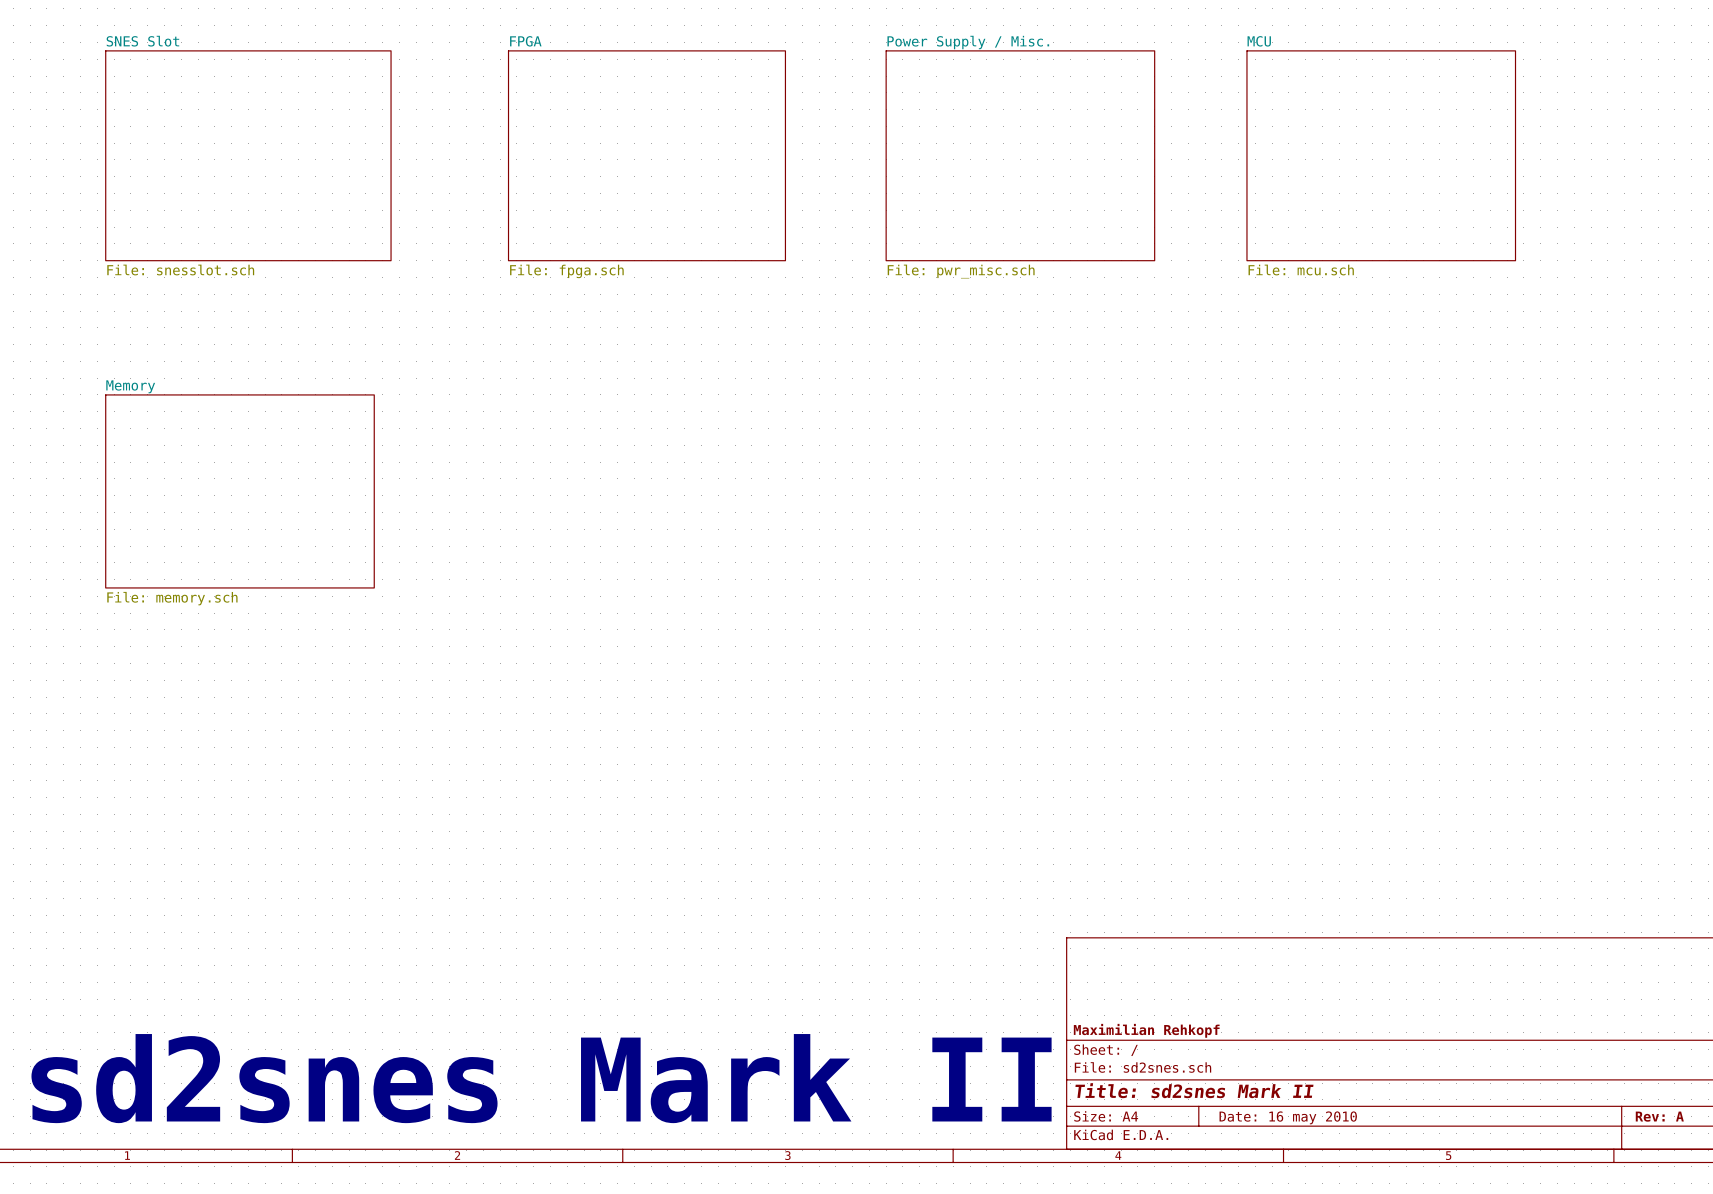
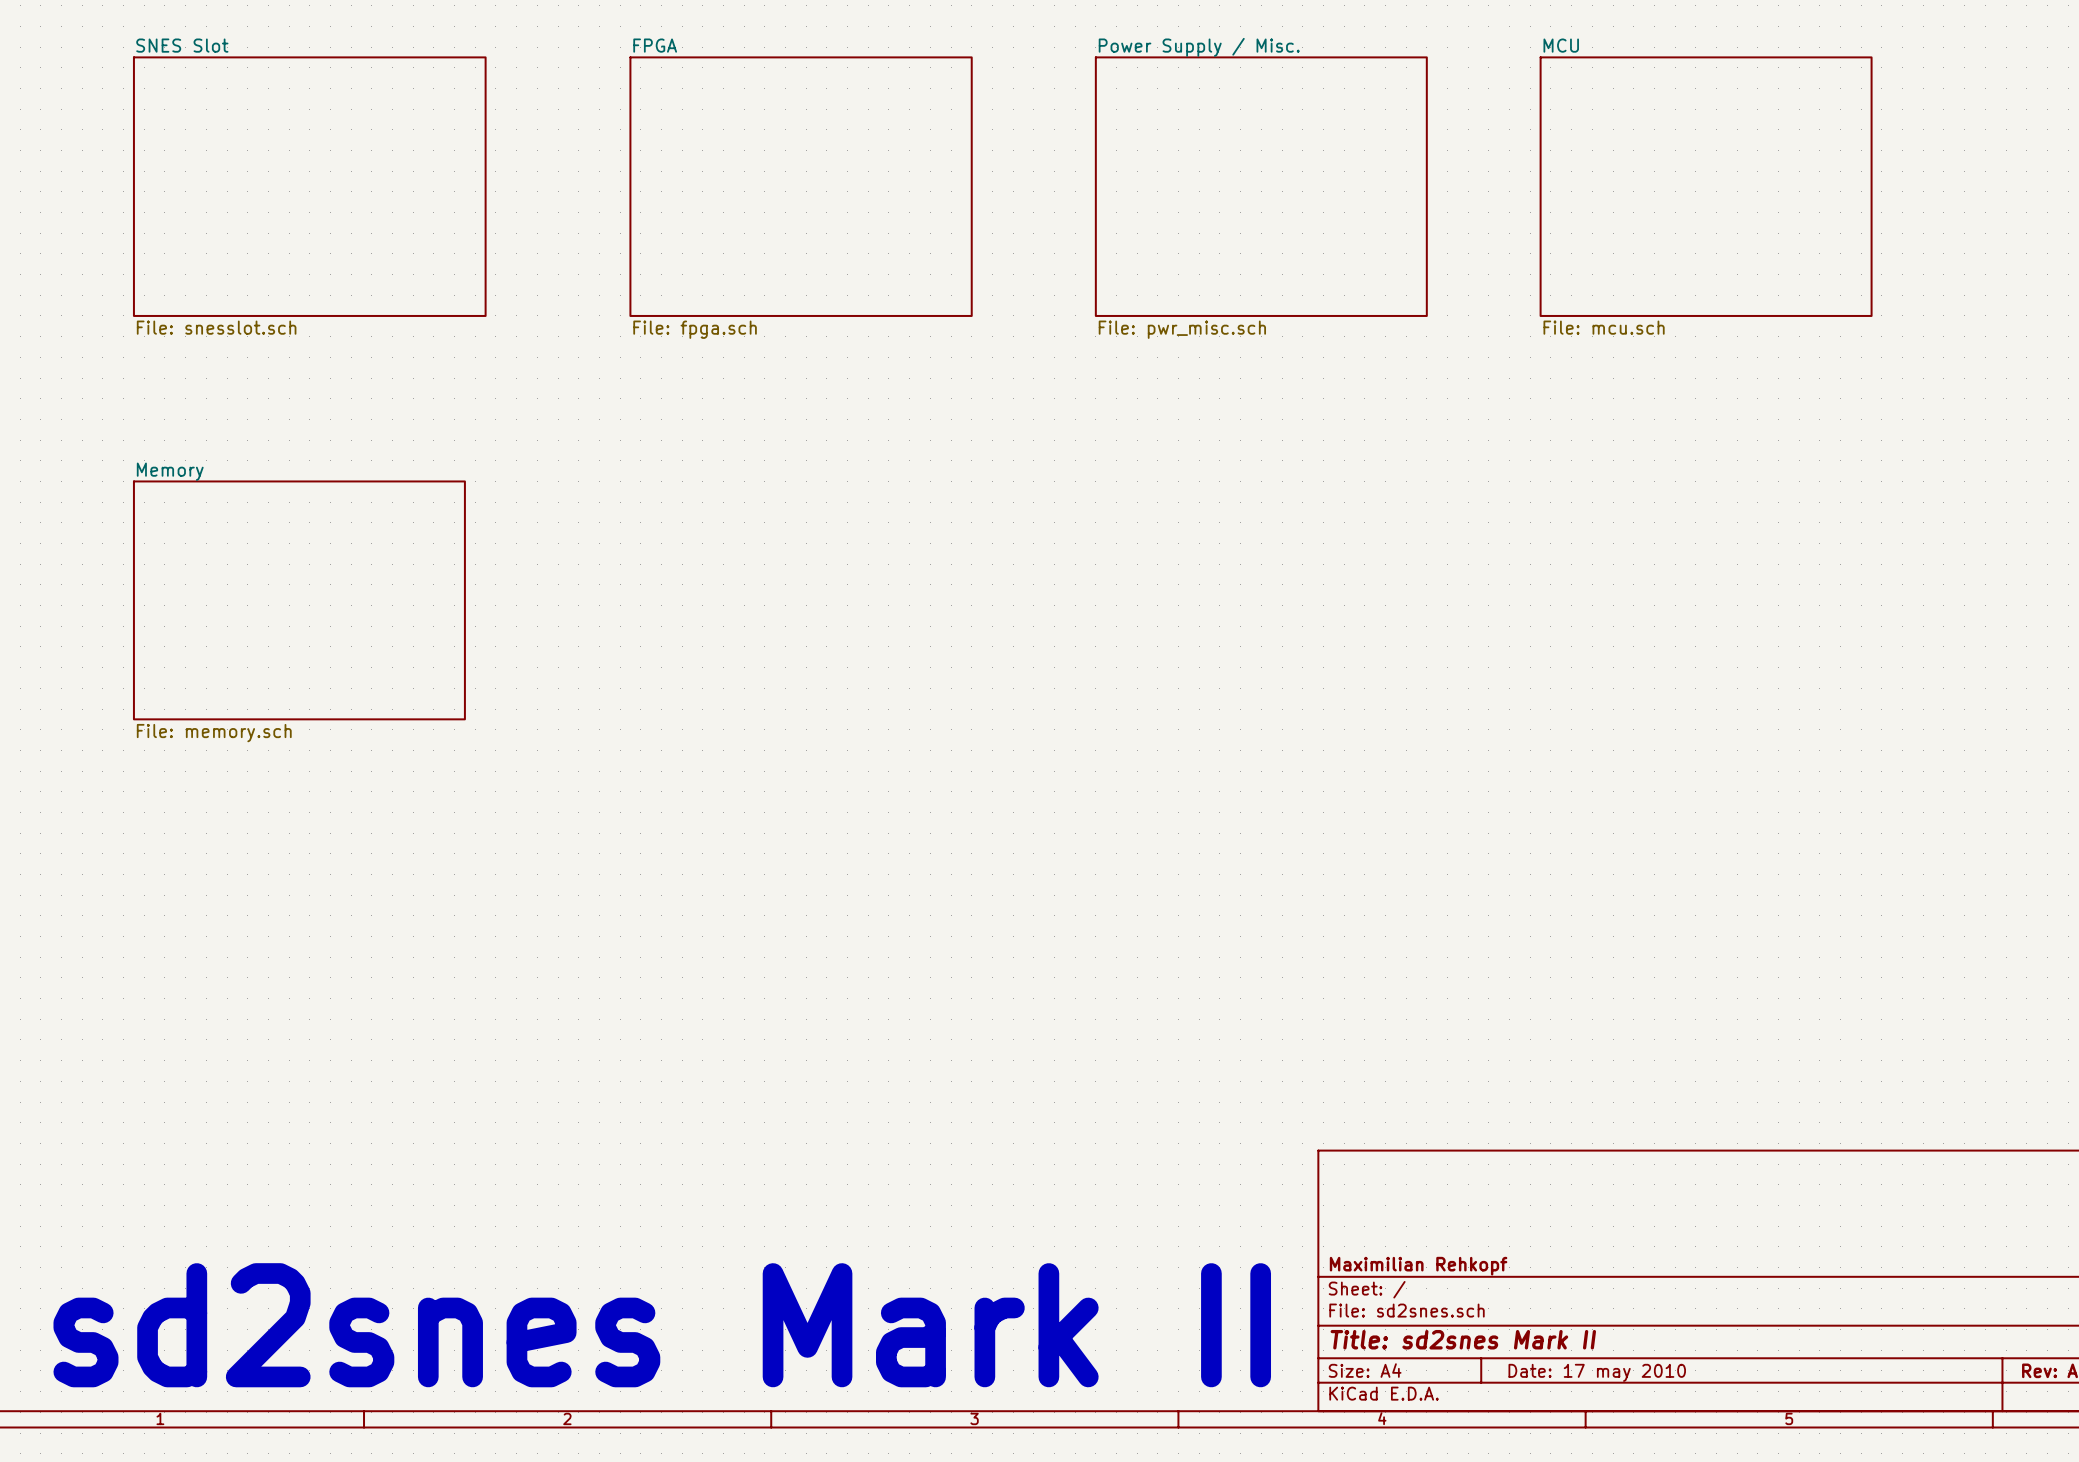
title block: Date: 16 may 2010 (1288, 1117) -> Date: 17 may 2010 (1597, 1372)

